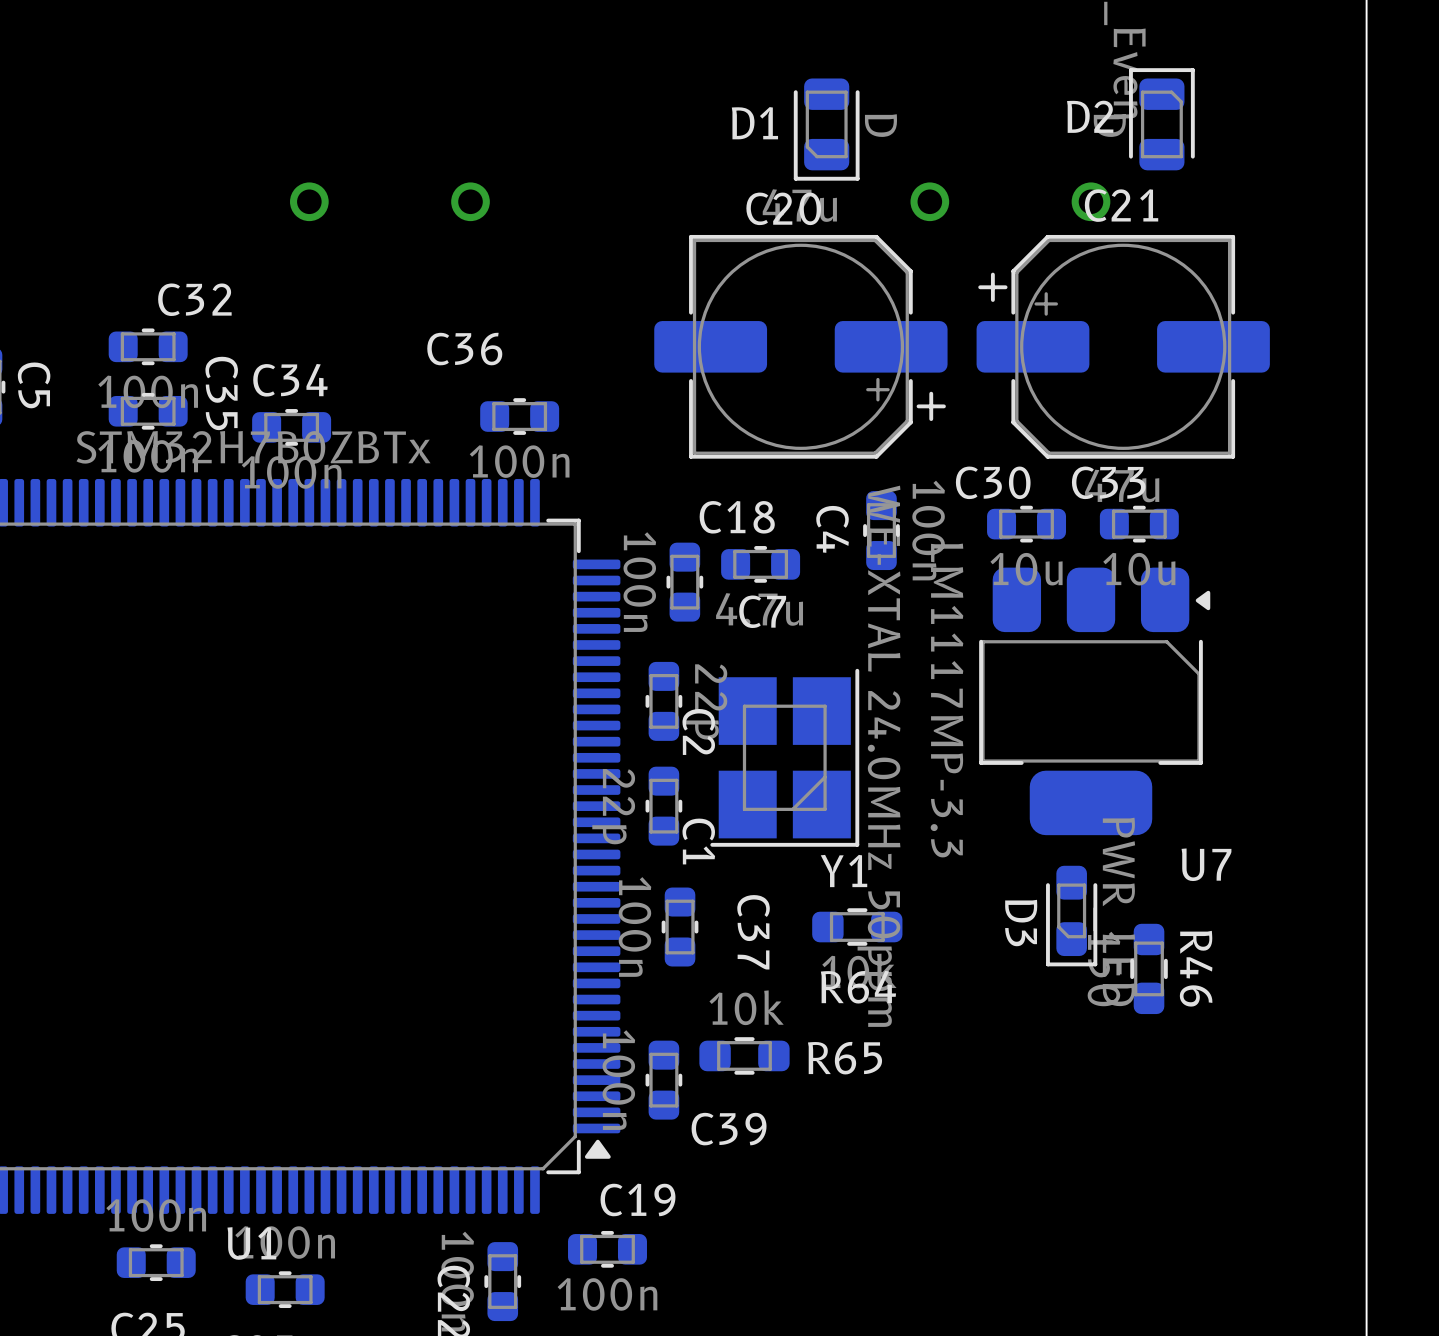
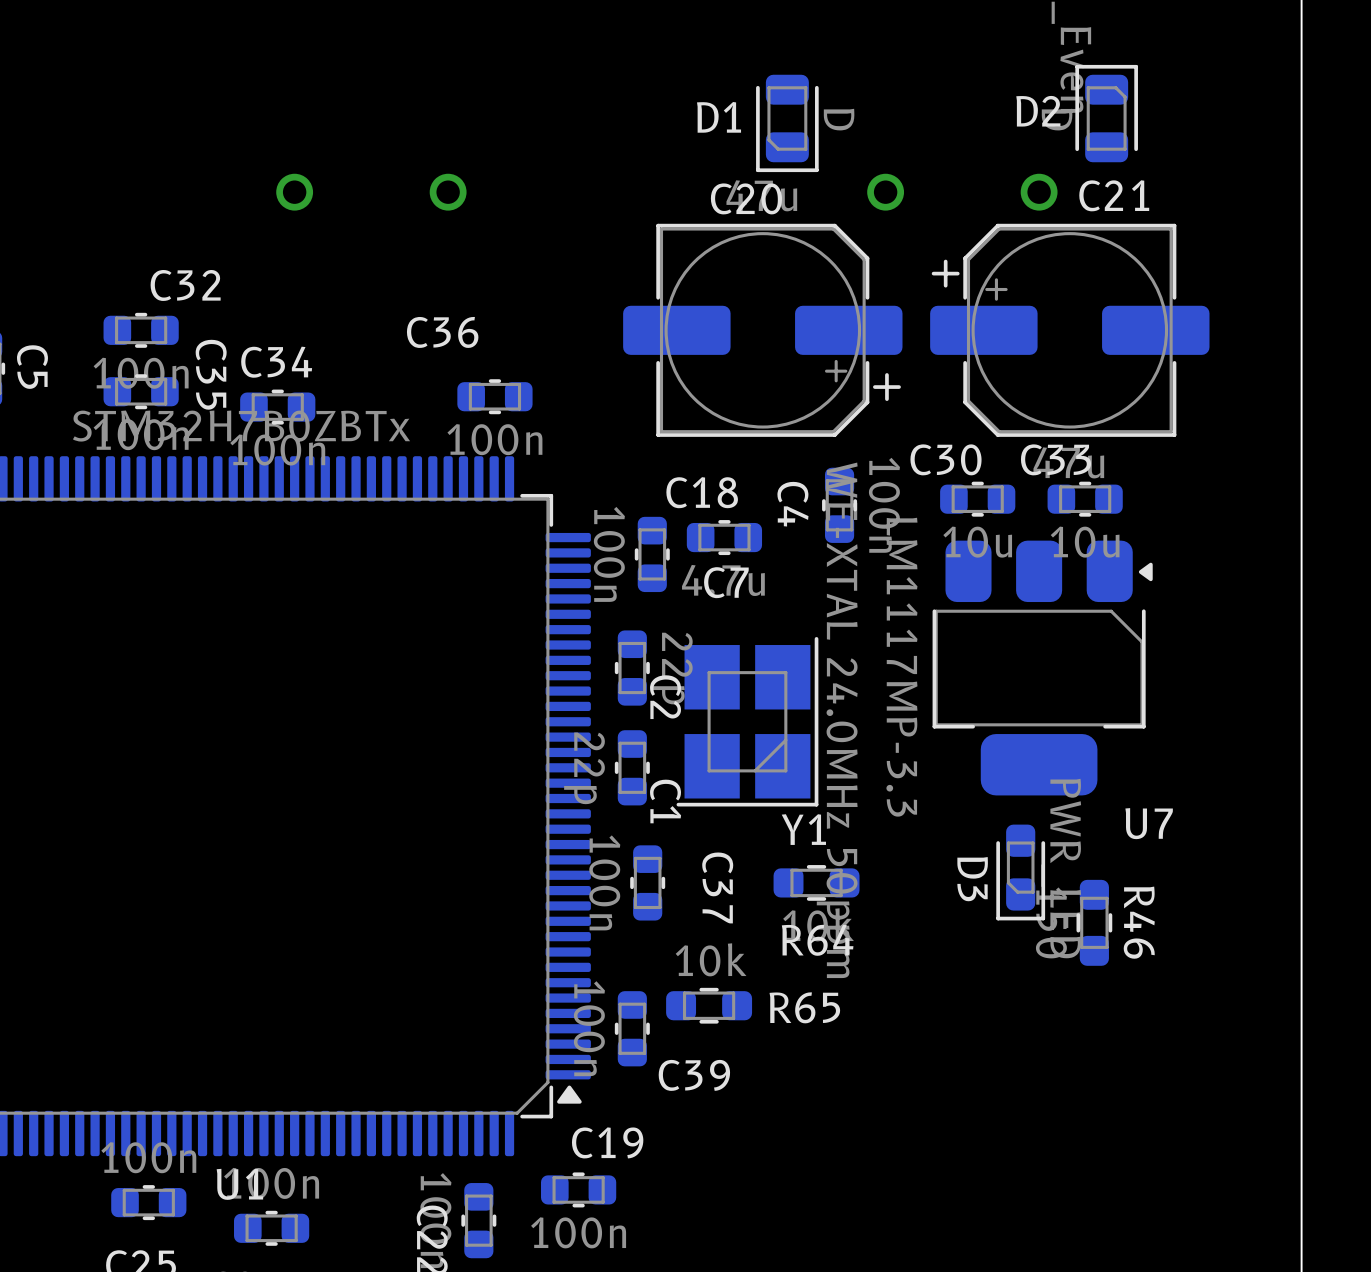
C21 name position: C21 (1121, 205) -> C21 (1114, 195)

